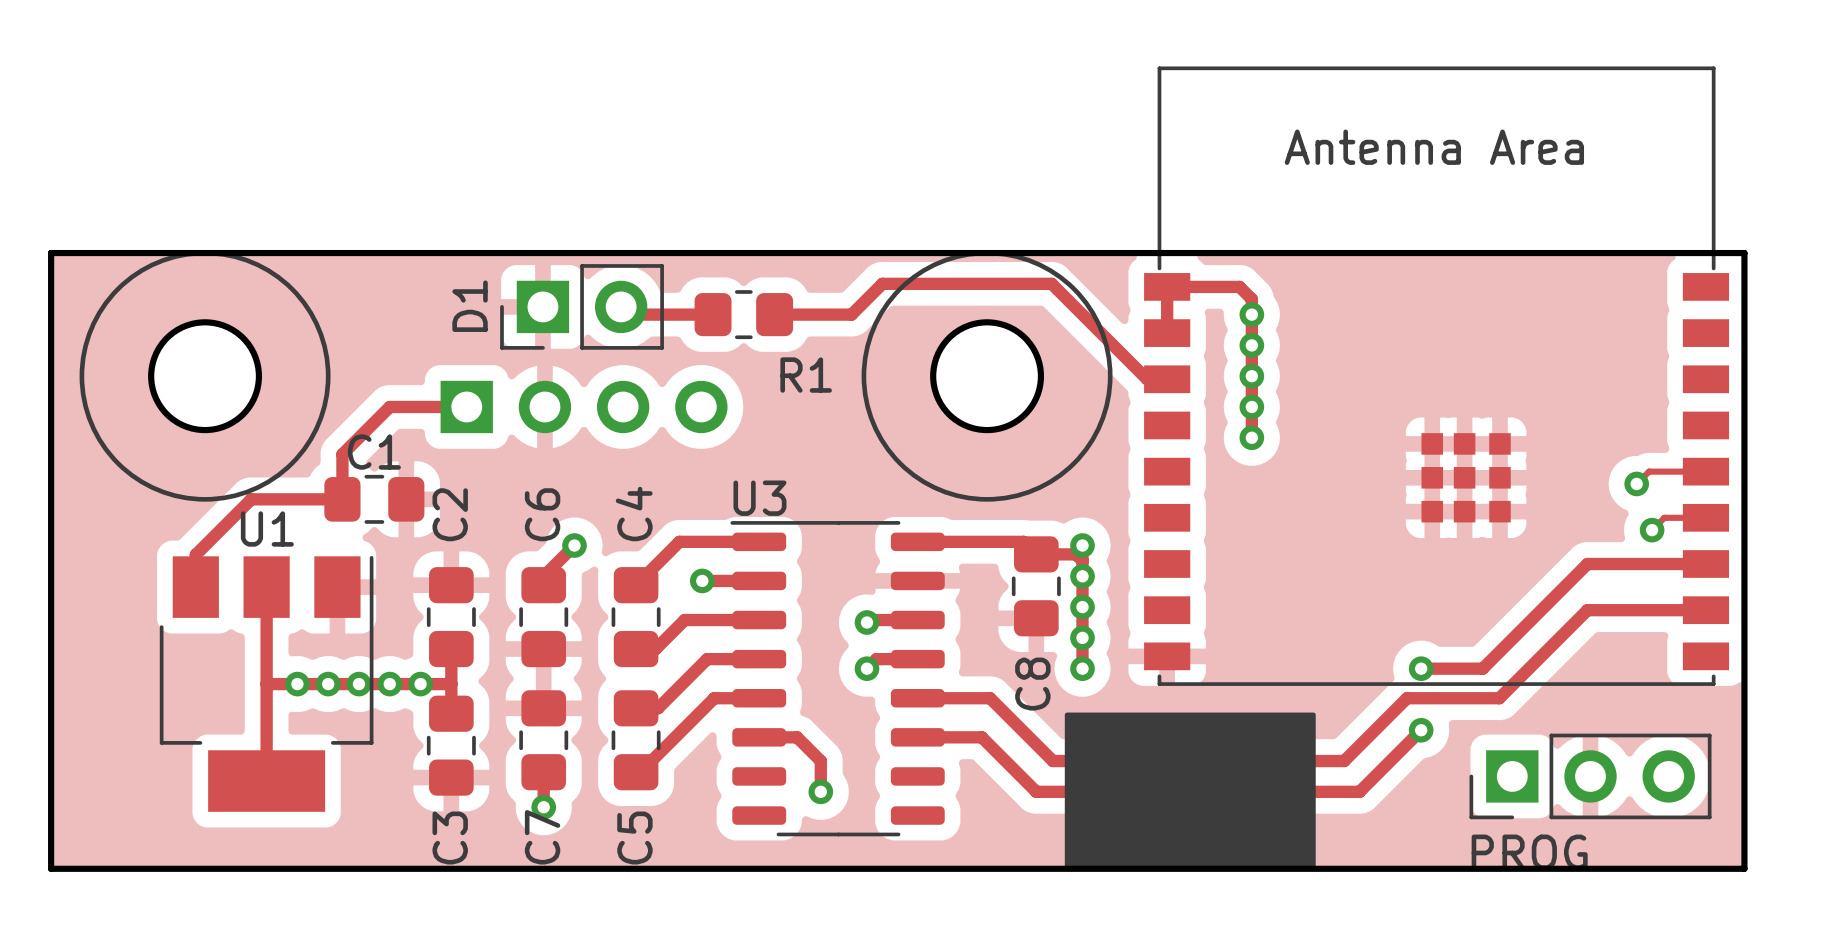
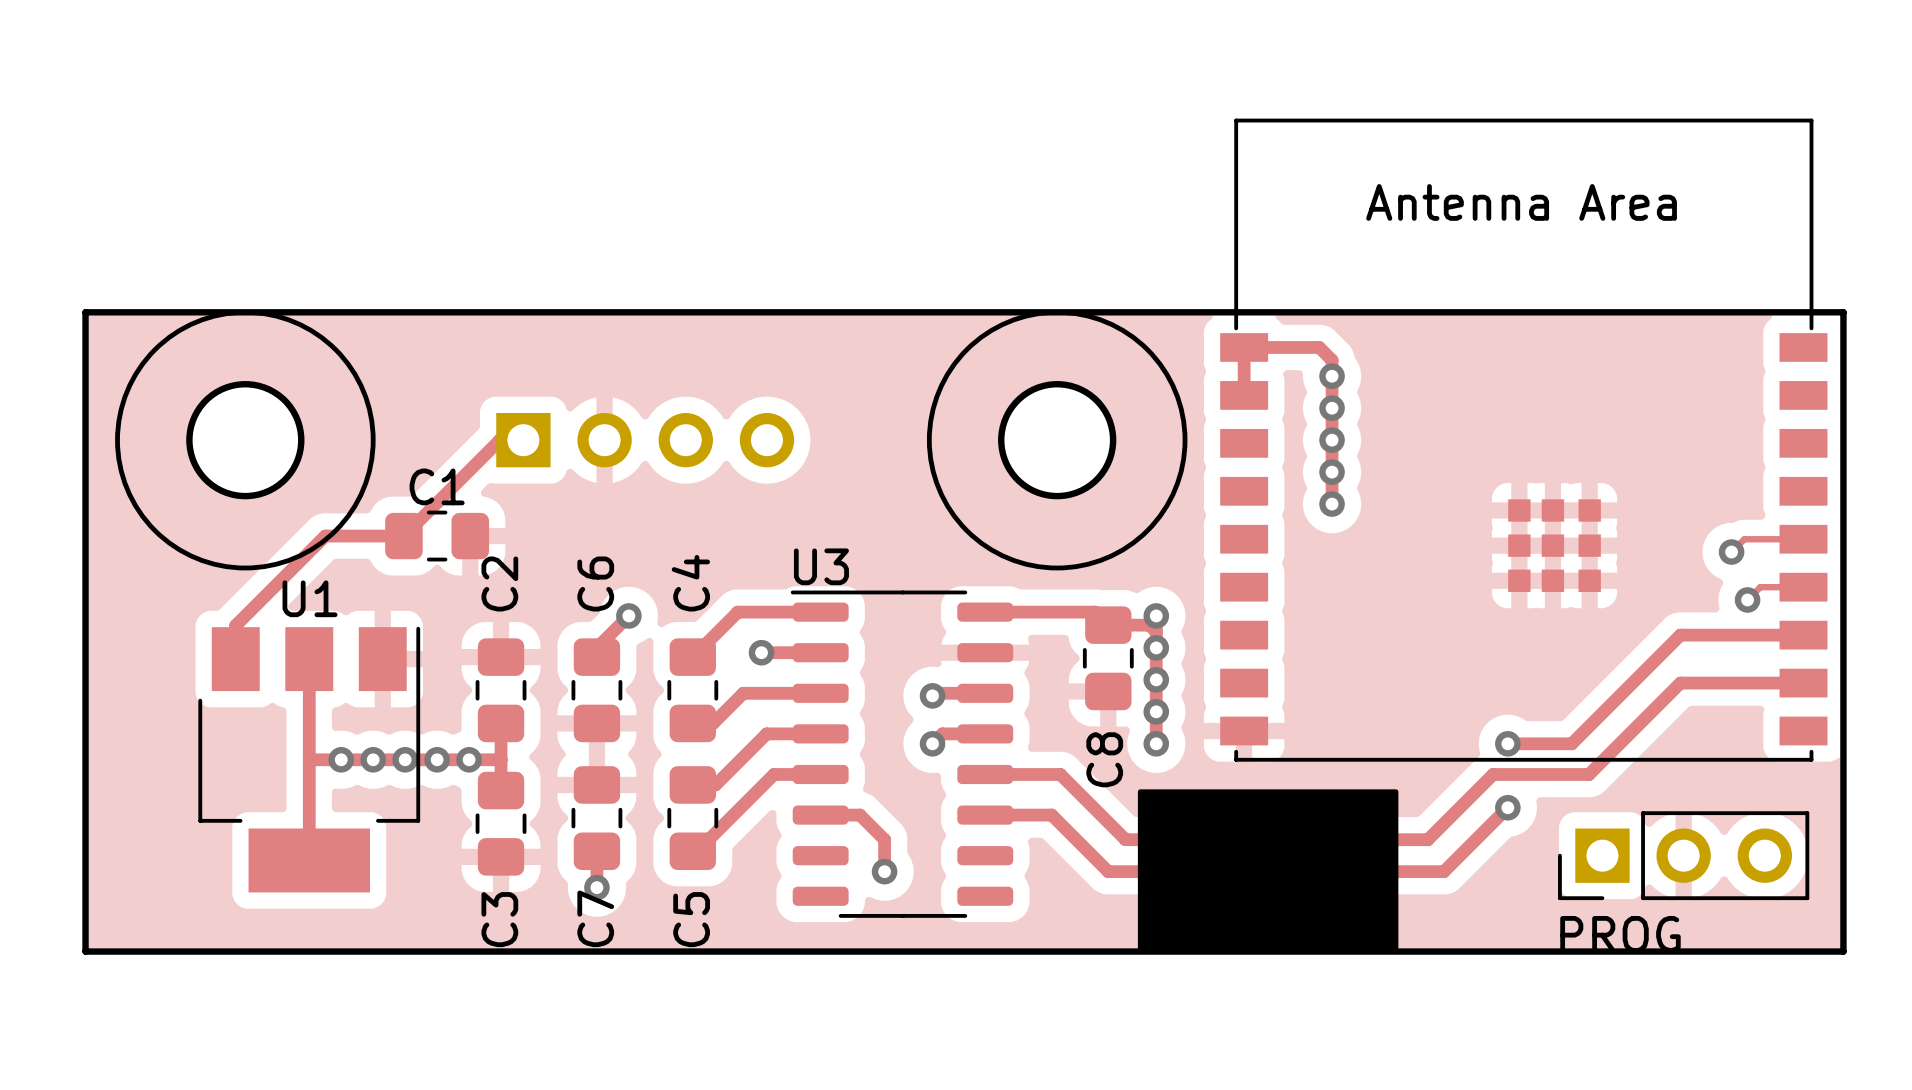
D1: (582, 306) -> none
track: (621, 306) (628, 314) (713, 314) -> none
R1: (743, 314) -> none
track: (774, 314) (851, 314) (882, 283) (1051, 283) (1147, 379) (1167, 379) -> none
track: (466, 406) (389, 406) (342, 454) (342, 499) (251, 499) -> (523, 440) (499, 440) (403, 536) (325, 536) (293, 568)
part position: (584, 406) -> (645, 440)
C1 position: (374, 499) -> (437, 536)

